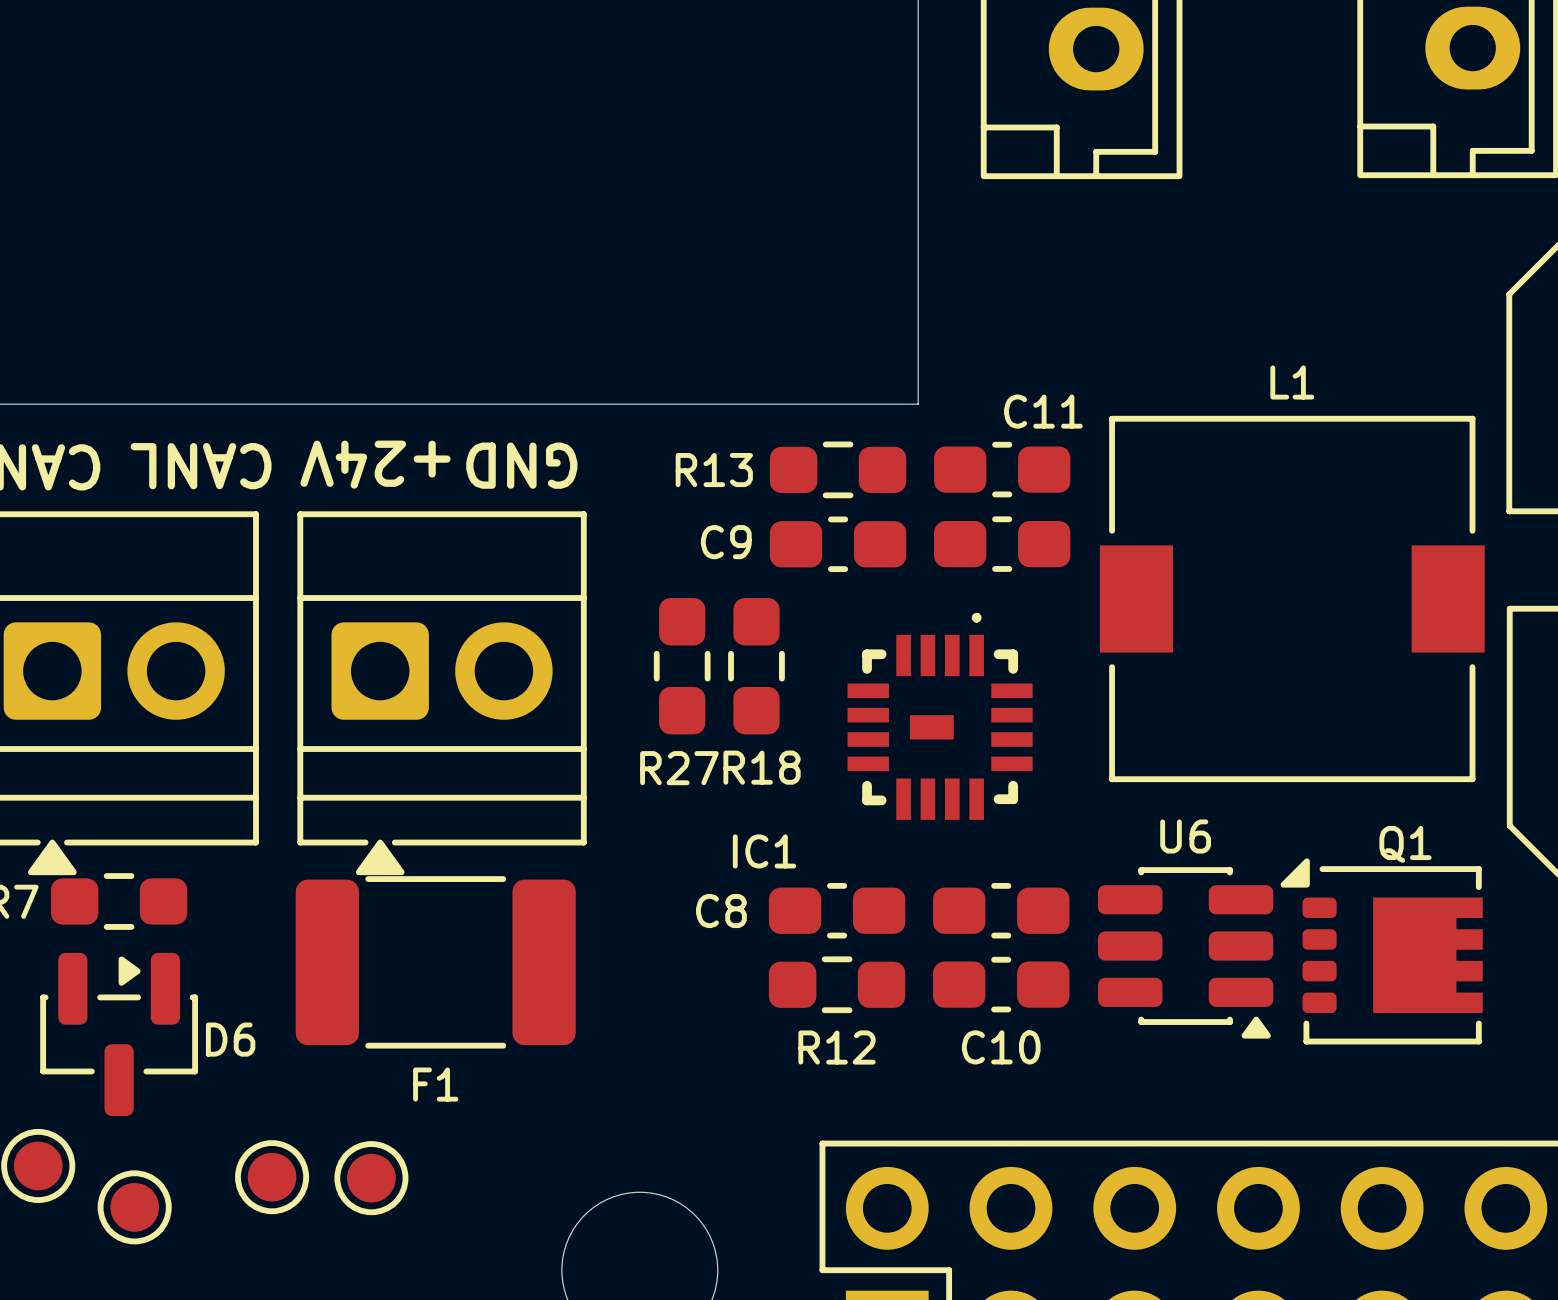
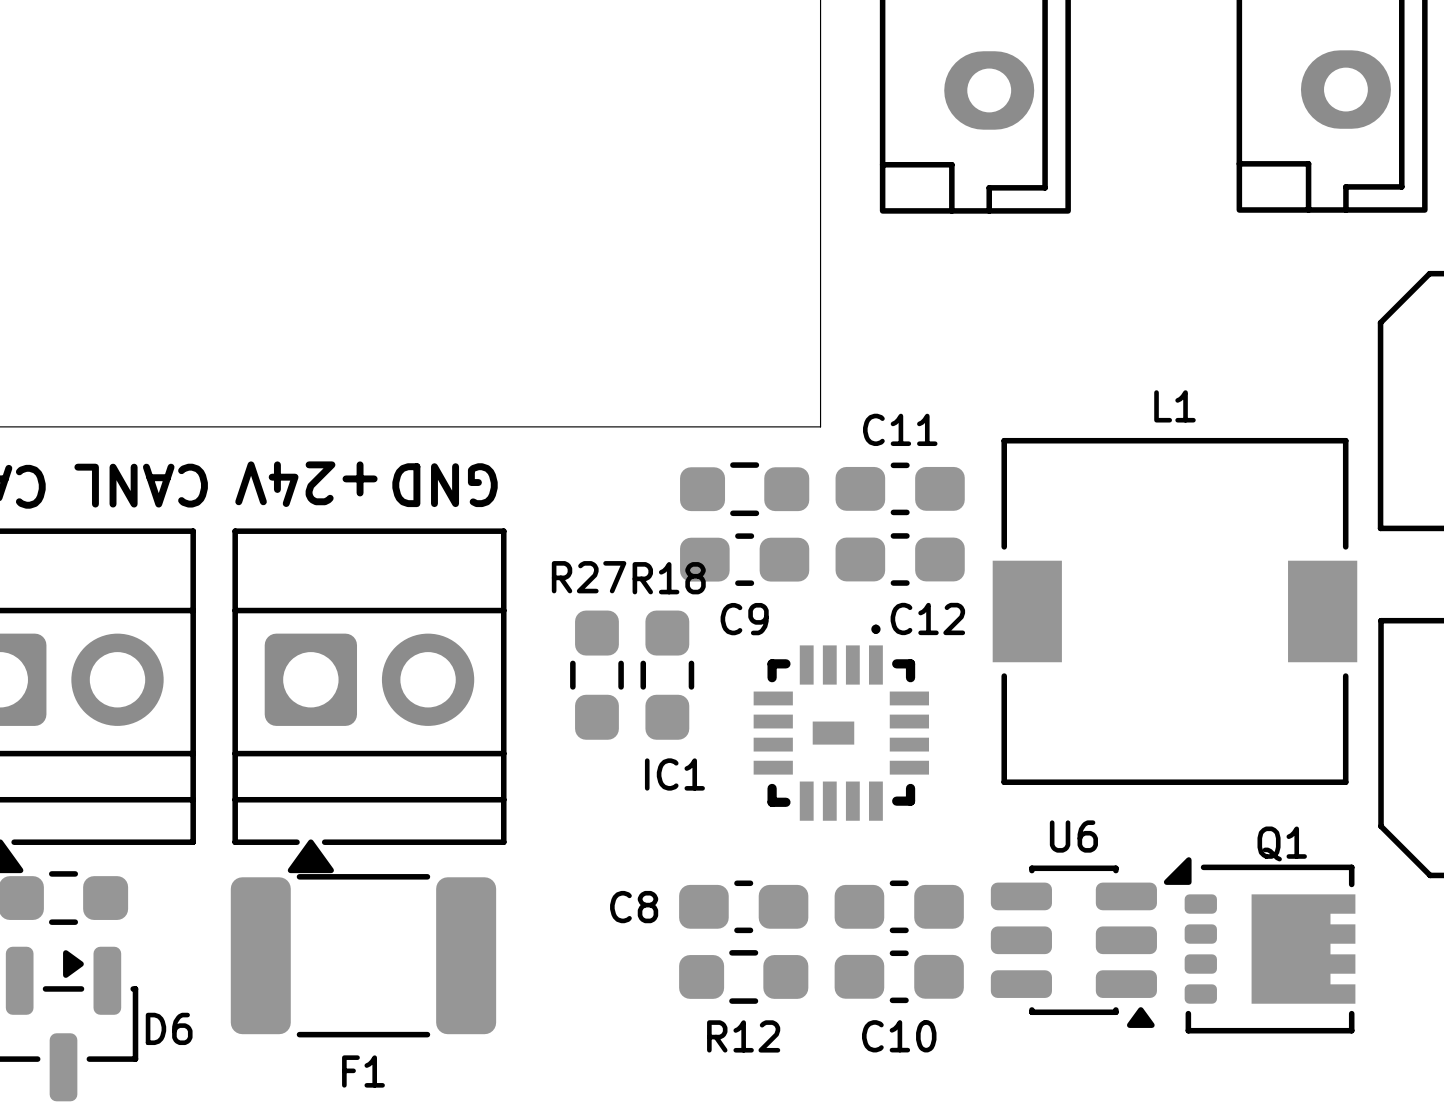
C11 name position: C11 (1043, 411) -> C11 (900, 429)
R13 name: R13 (714, 470) -> none
C9 name position: C9 (726, 542) -> C9 (744, 619)
C12 name: none -> C12 (927, 618)
R18 name position: R18 (762, 767) -> R18 (669, 578)
R27 name position: R27 (679, 768) -> R27 (589, 577)
IC1 name position: IC1 (764, 851) -> IC1 (674, 774)

